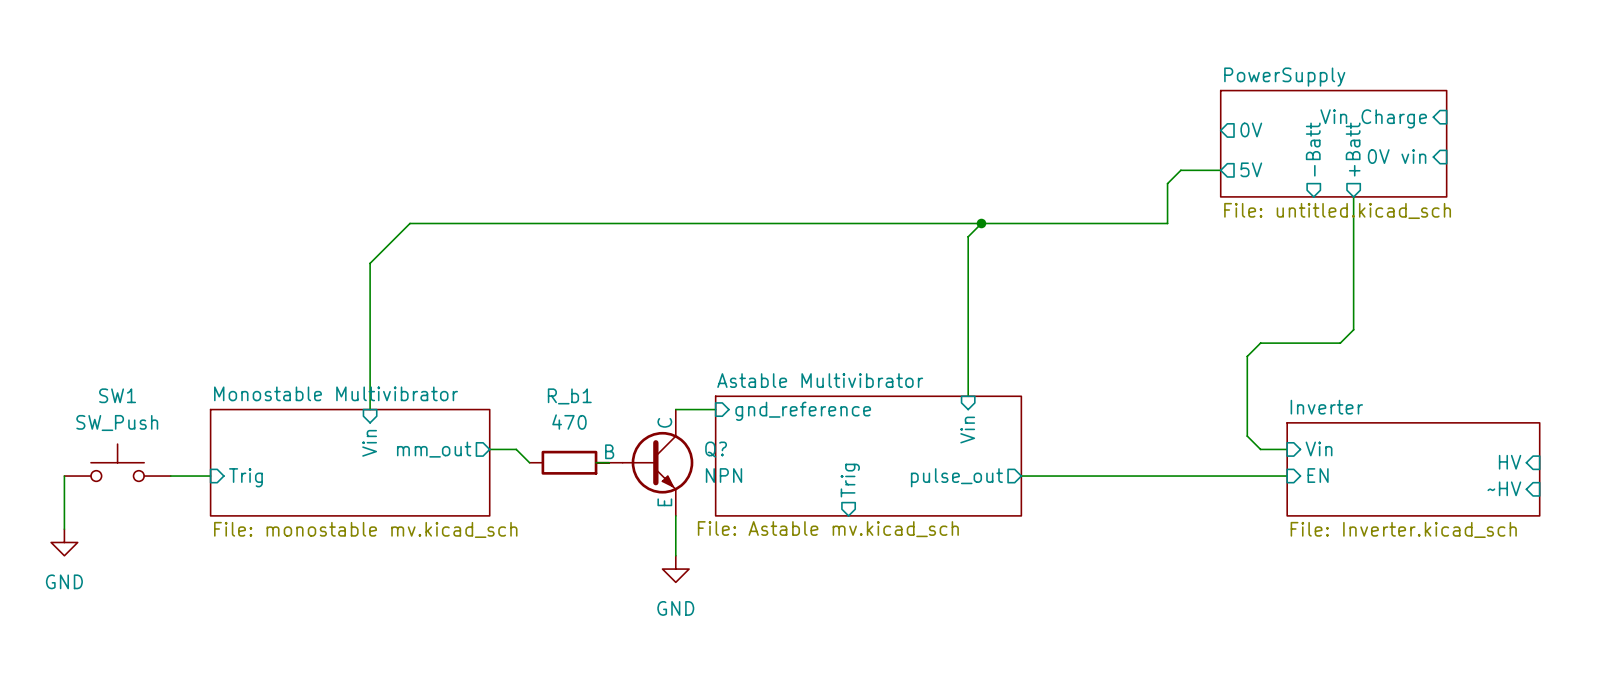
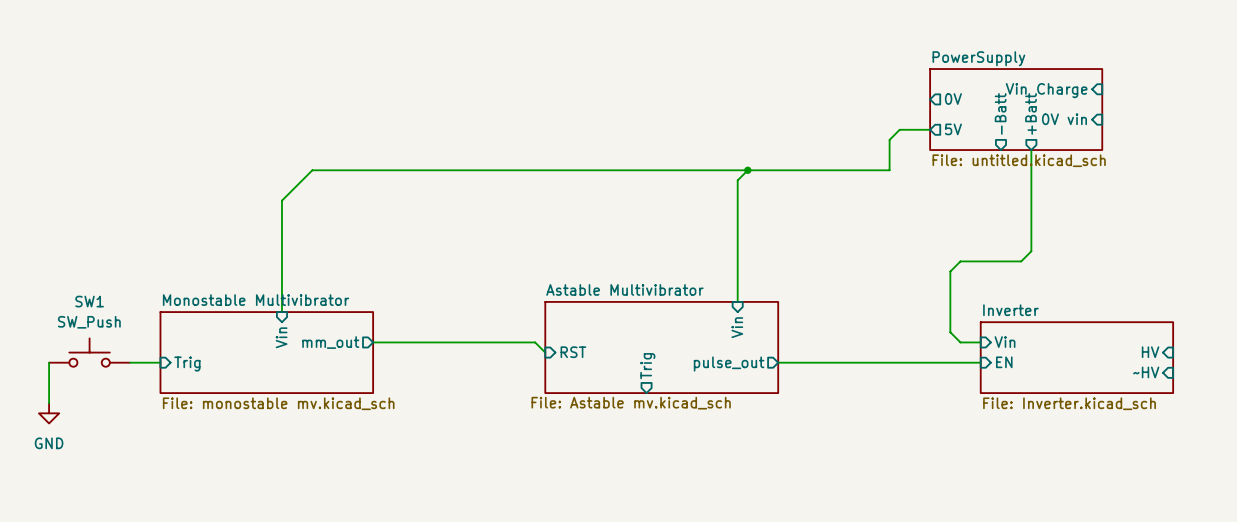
wire: (675, 409) (715, 409) -> none
sheet pin: gnd_reference (803, 411) -> none
wire: (516, 449) (529, 462) -> (393, 342) (535, 342) (545, 352)
R_b1: 470 (569, 462) -> none
wire: (596, 462) (609, 462) -> none
Q?: NPN (644, 462) -> none
sheet pin: none -> RST (573, 352)
wire: (675, 515) (675, 555) -> none
power symbol: GND (675, 569) -> none

